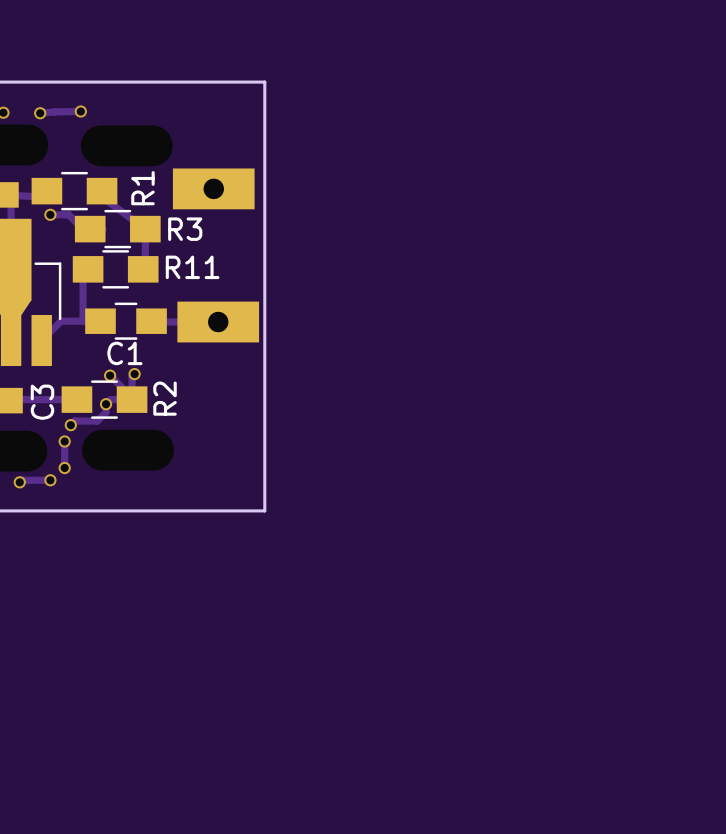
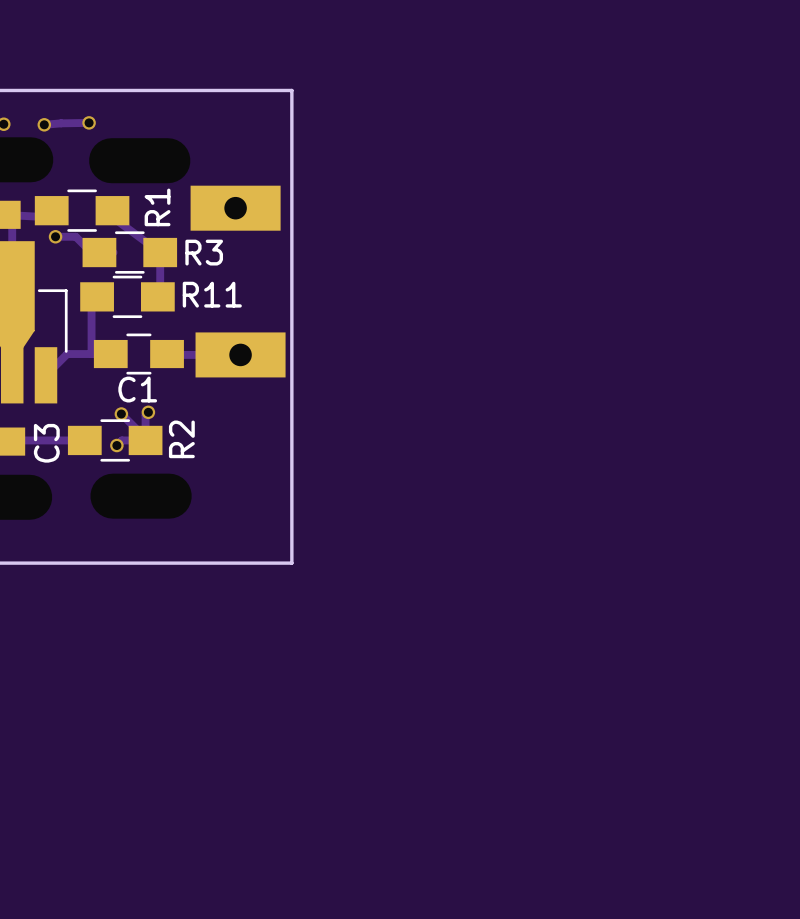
track: (106, 404) (106, 412) (97, 421) (74, 421) (70, 425) -> none
via: (70, 425) -> none
track: (64, 441) (64, 468) -> none
via: (64, 441) -> none
via: (64, 468) -> none
track: (50, 480) (21, 480) (19, 482) -> none
via: (50, 480) -> none
via: (19, 482) -> none

